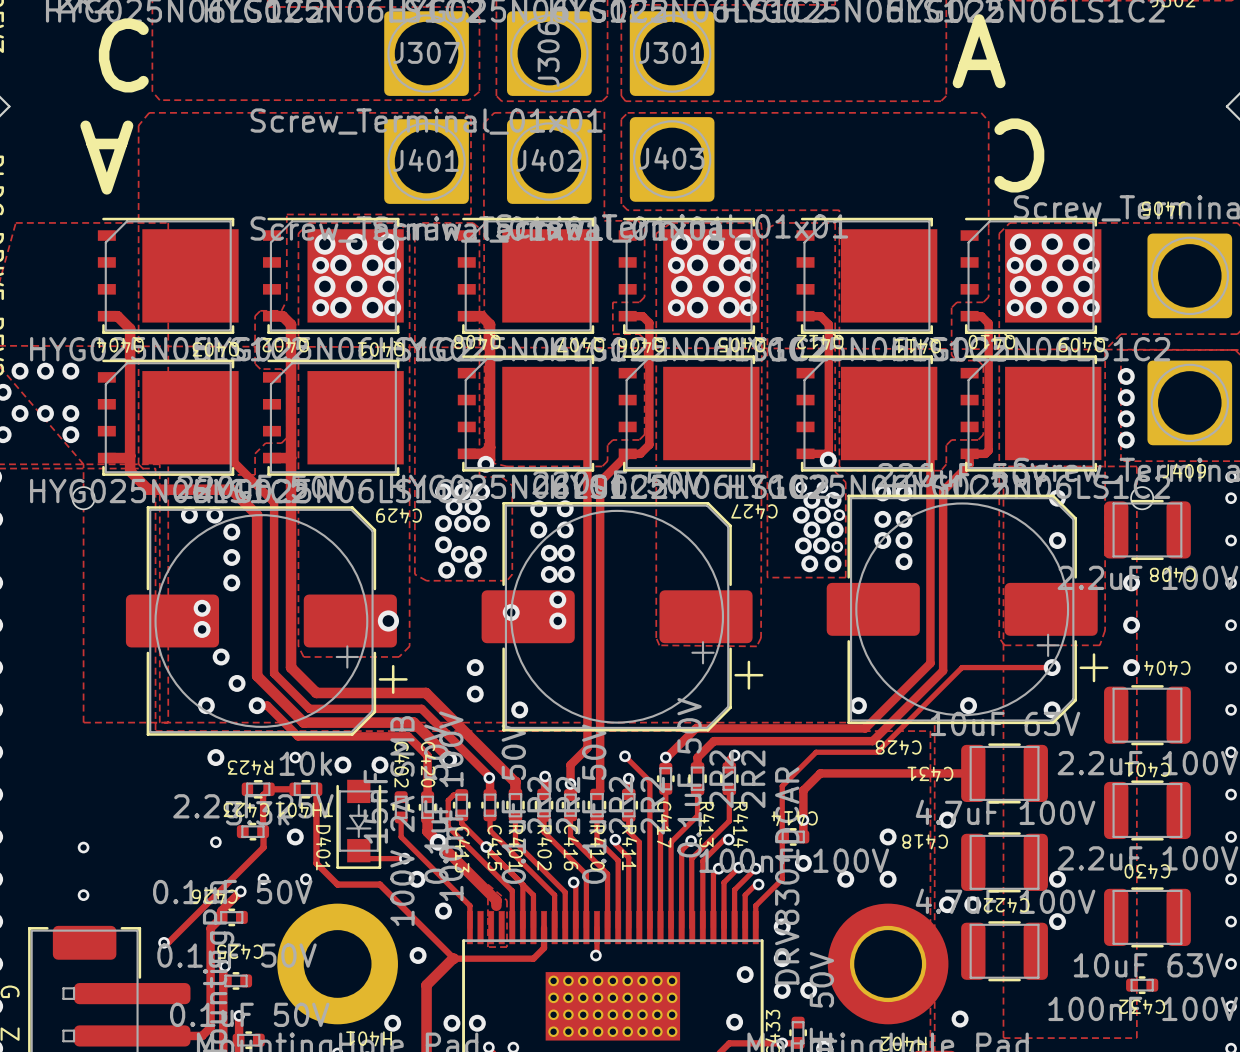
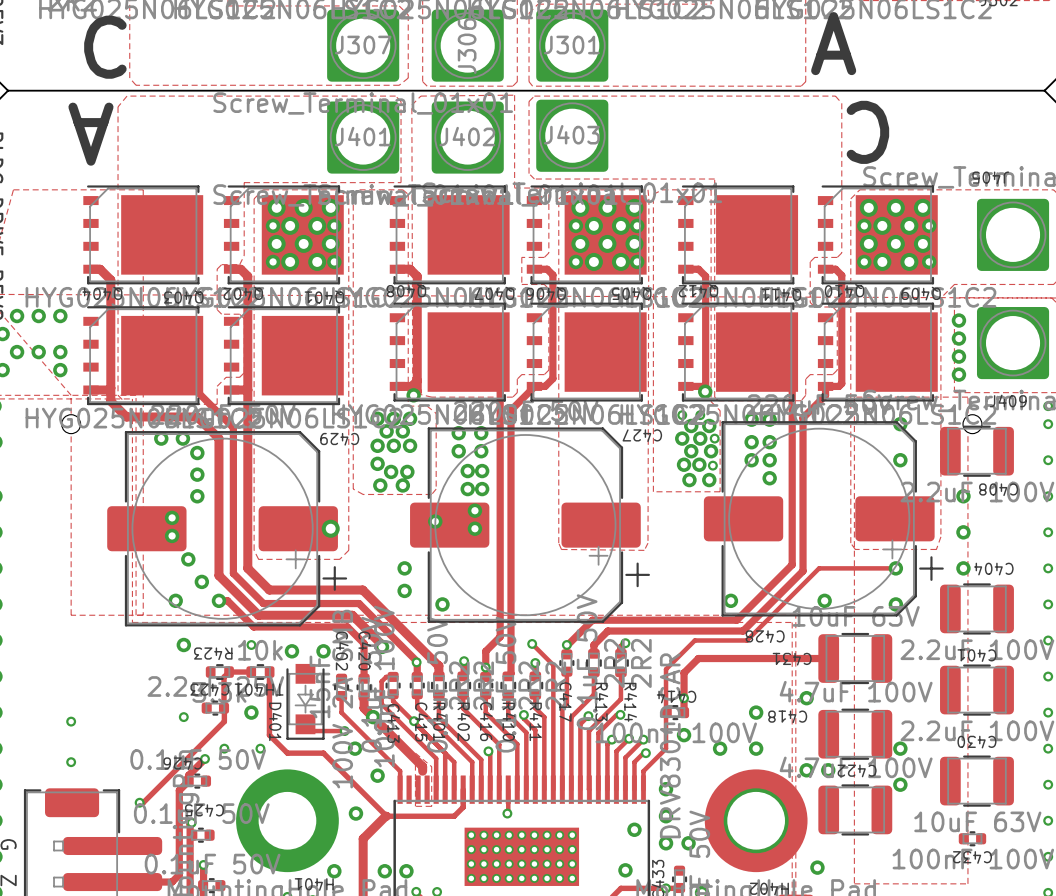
board edge: none -> (8, 90) (1044, 90)

